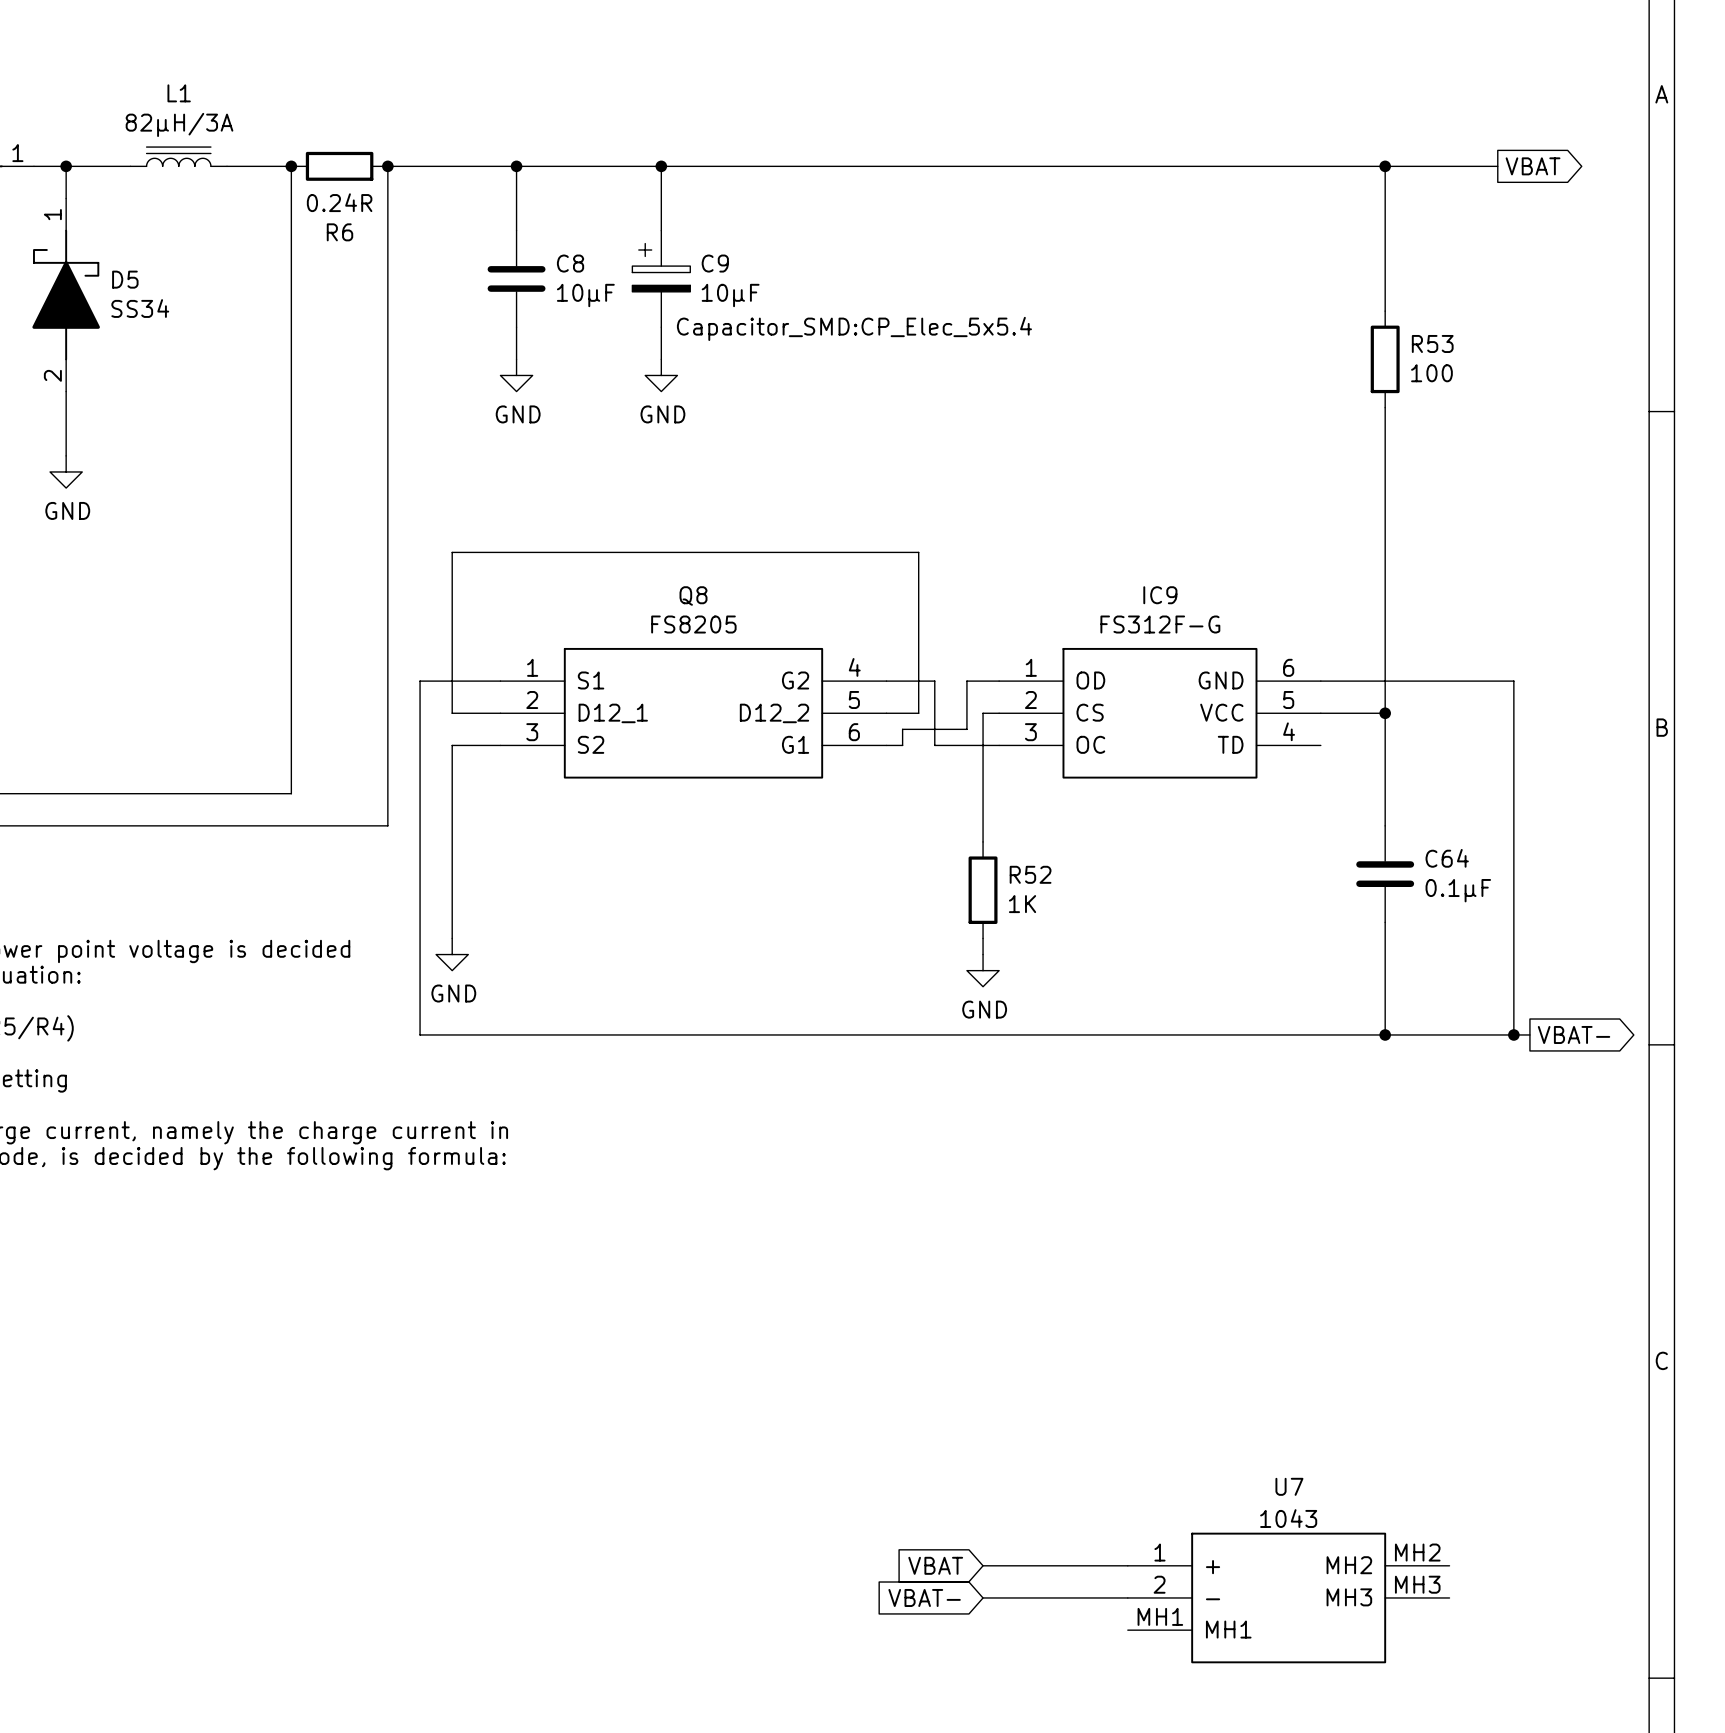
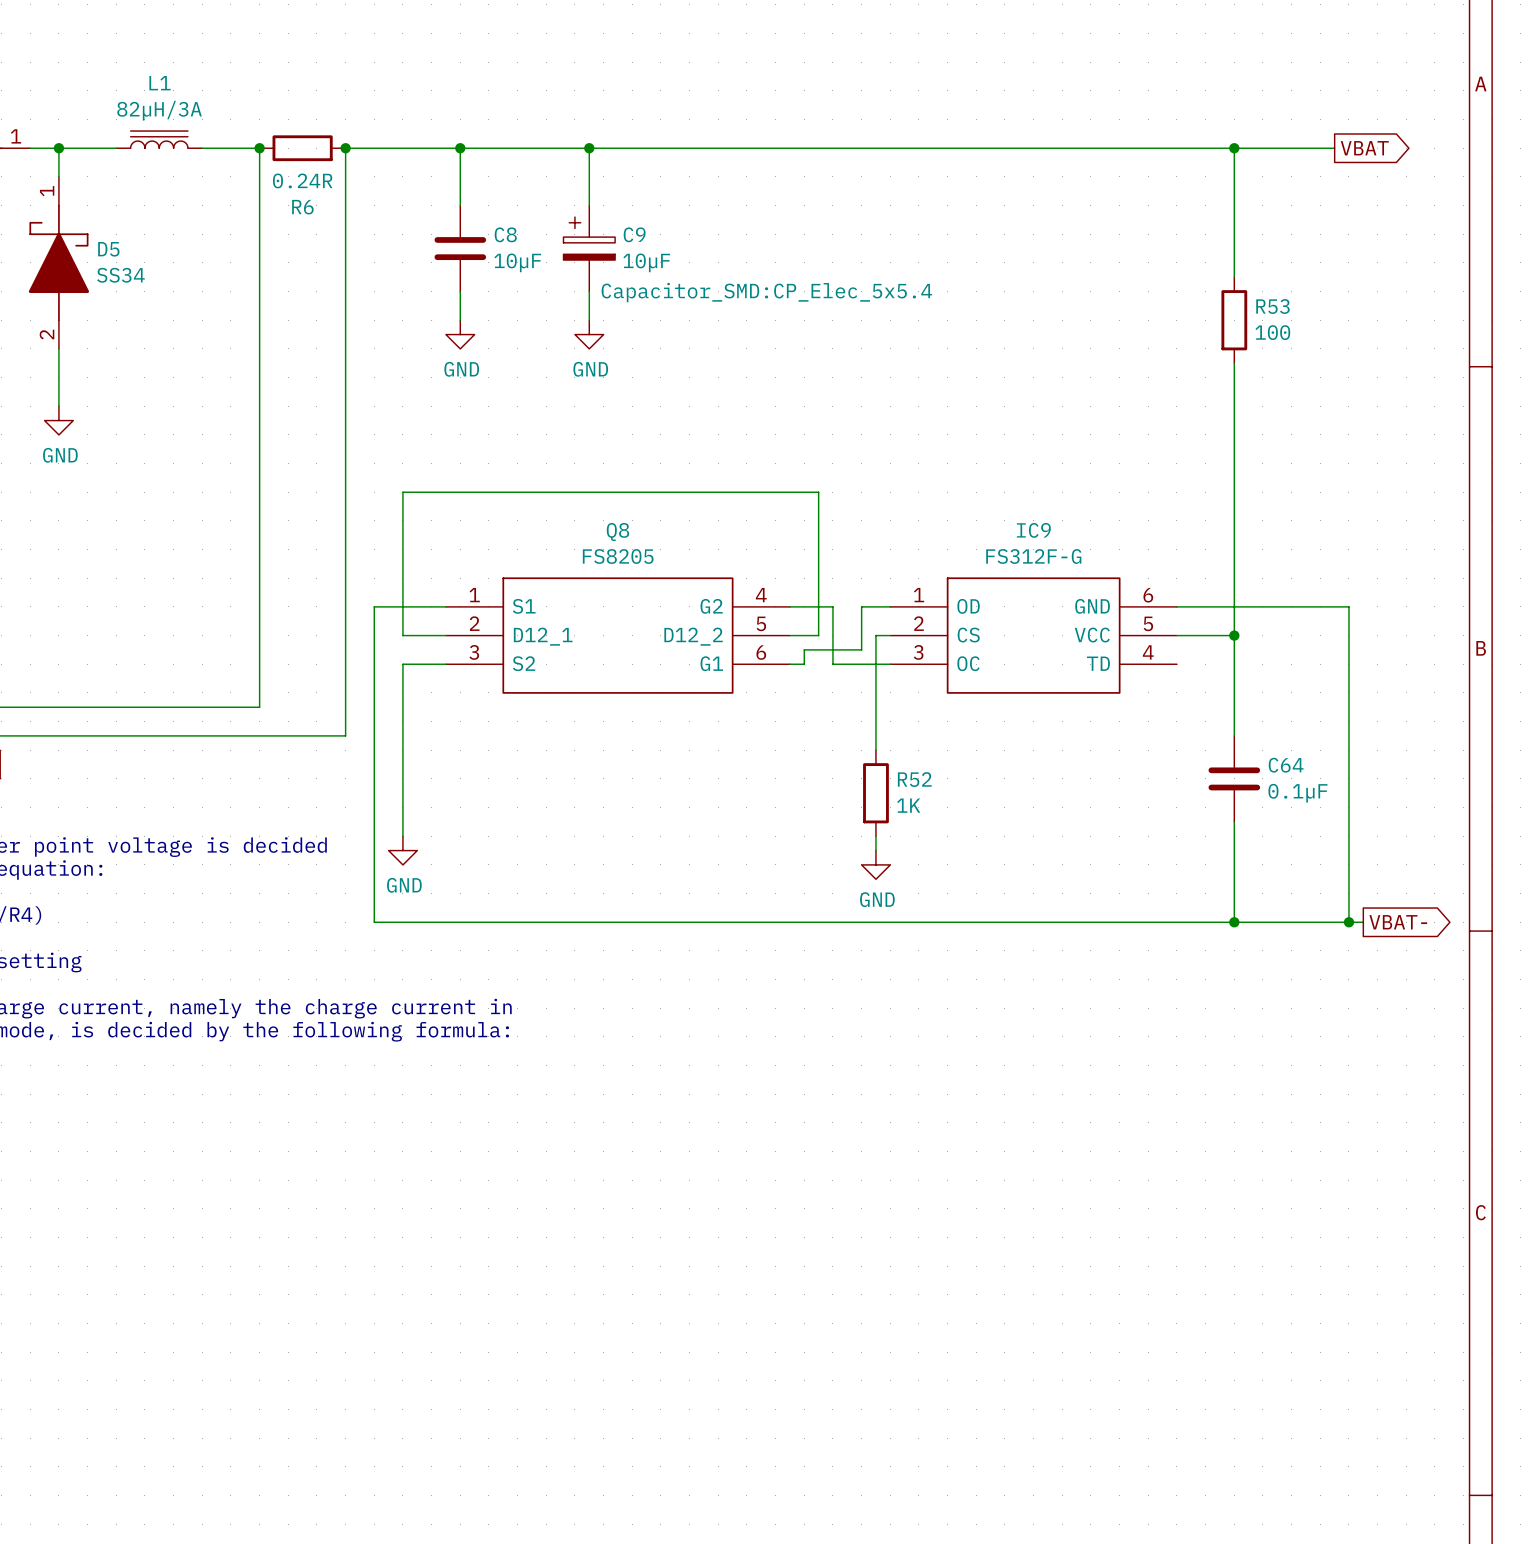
global label: VBAT (935, 1565) -> none
wire: (983, 1565) (1127, 1565) -> none
global label: VBAT- (924, 1597) -> none
wire: (983, 1597) (1127, 1597) -> none
U7: 1043 (1288, 1597) -> none

